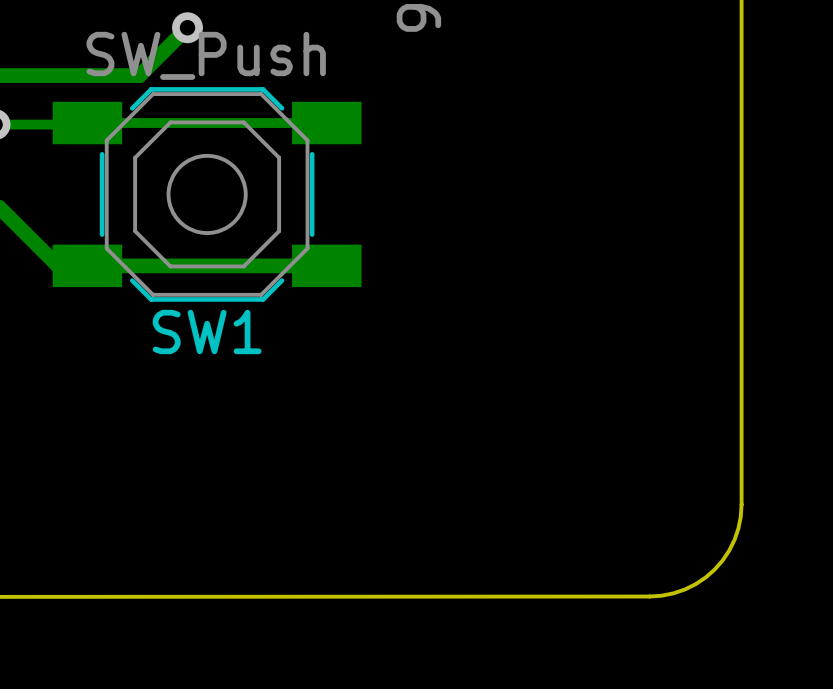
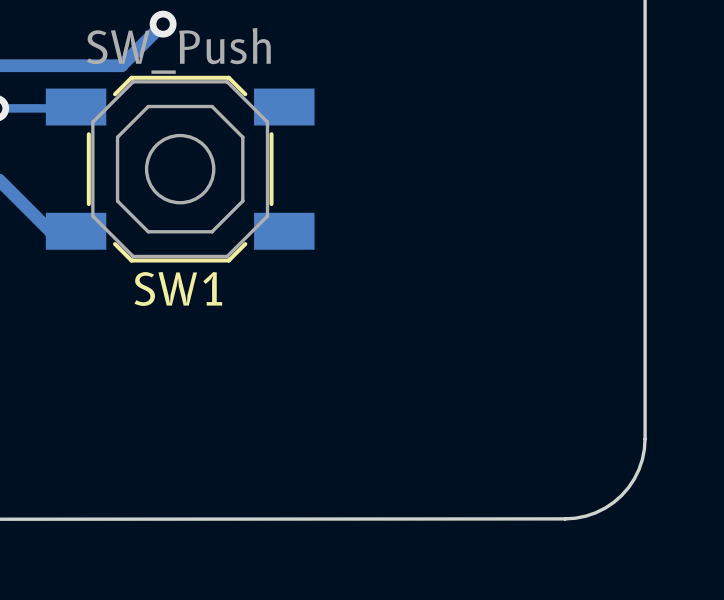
track: (326, 123) (87, 123) -> none
track: (326, 265) (87, 265) -> none

